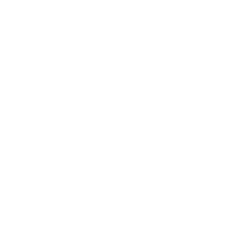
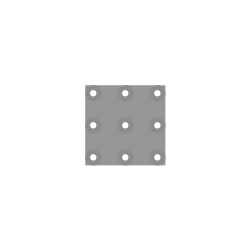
part: none -> (125, 125)

